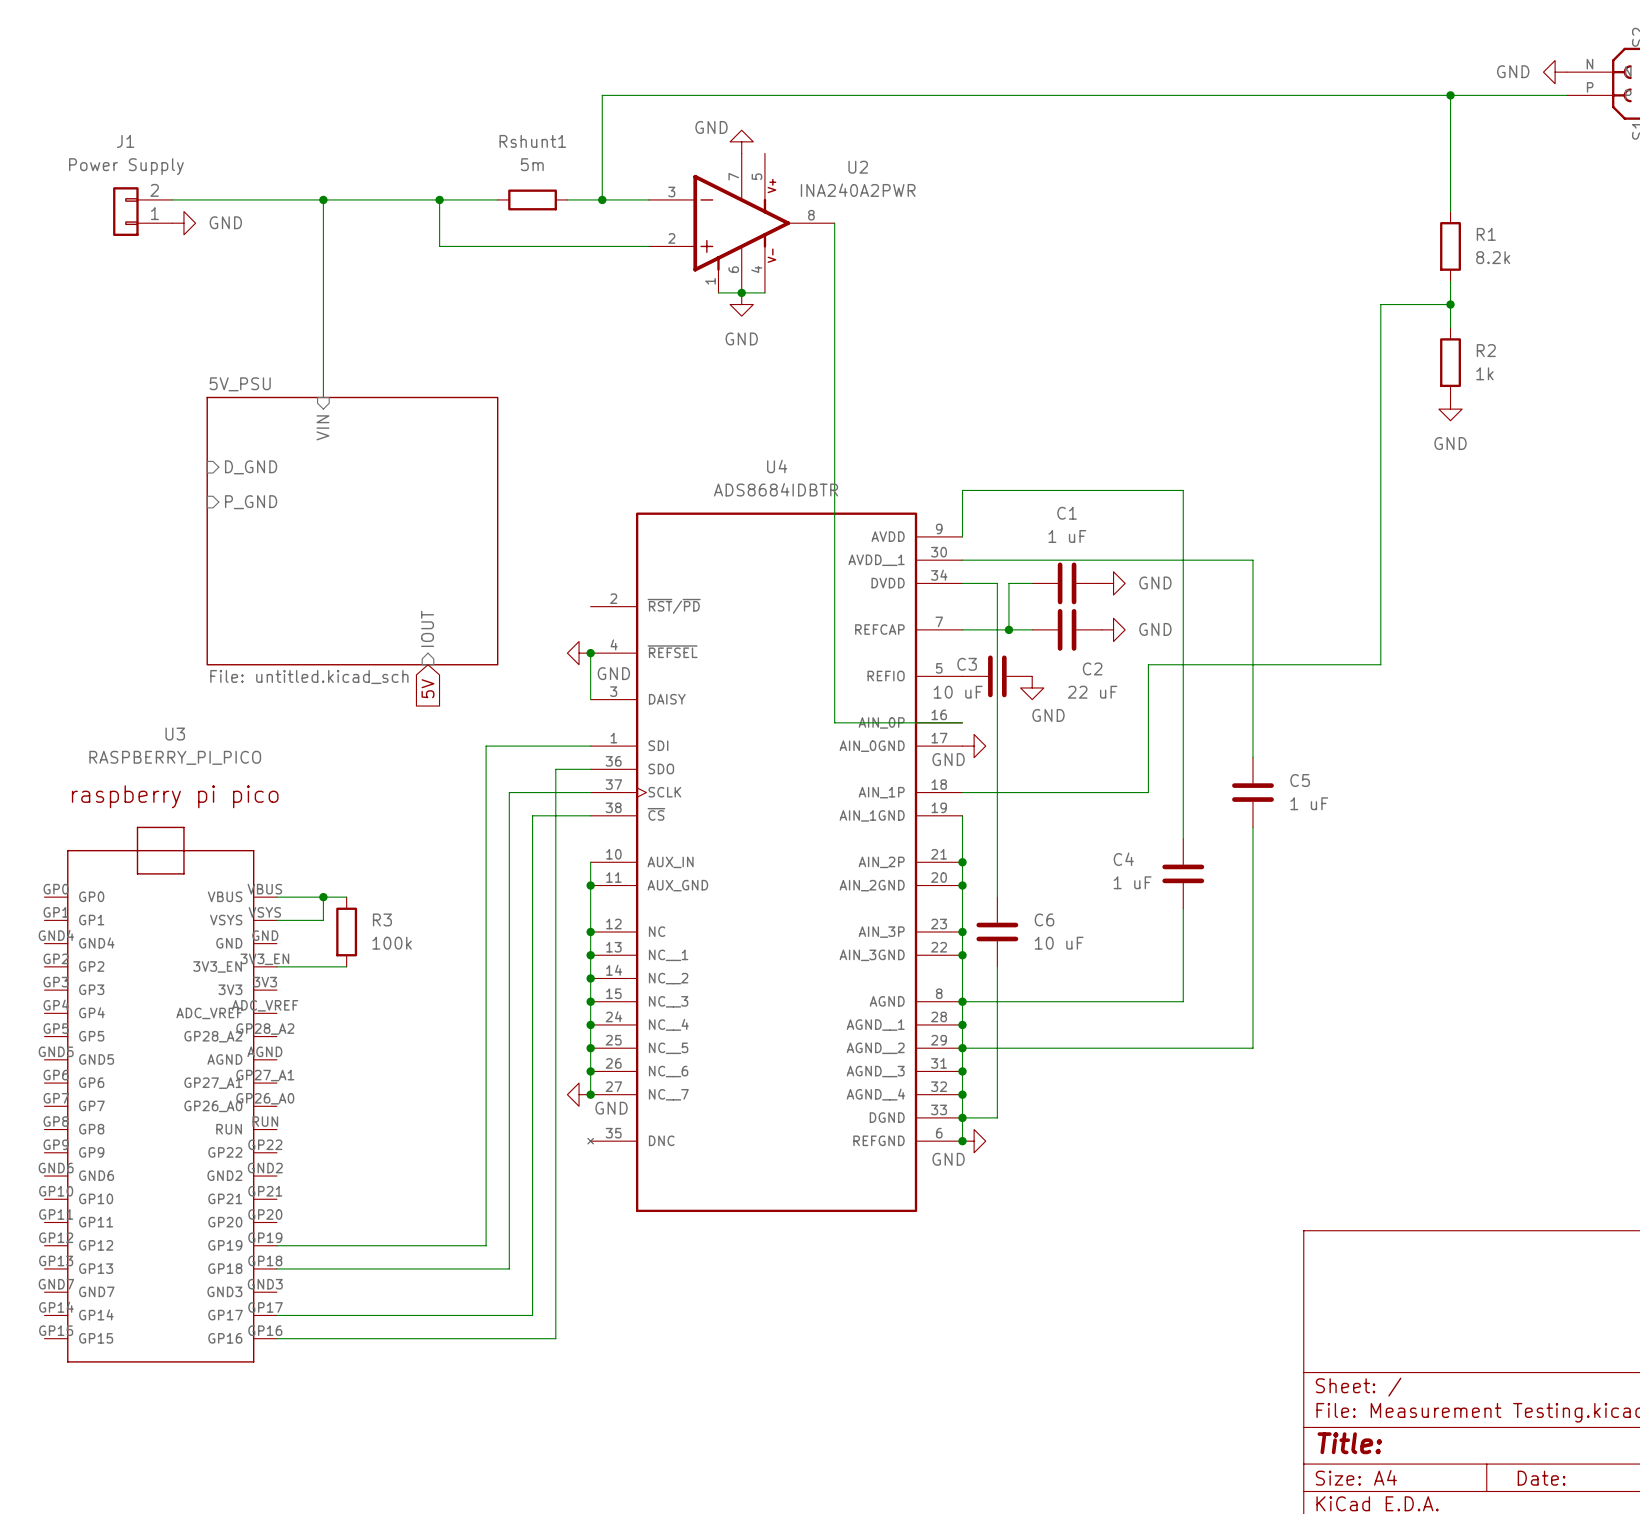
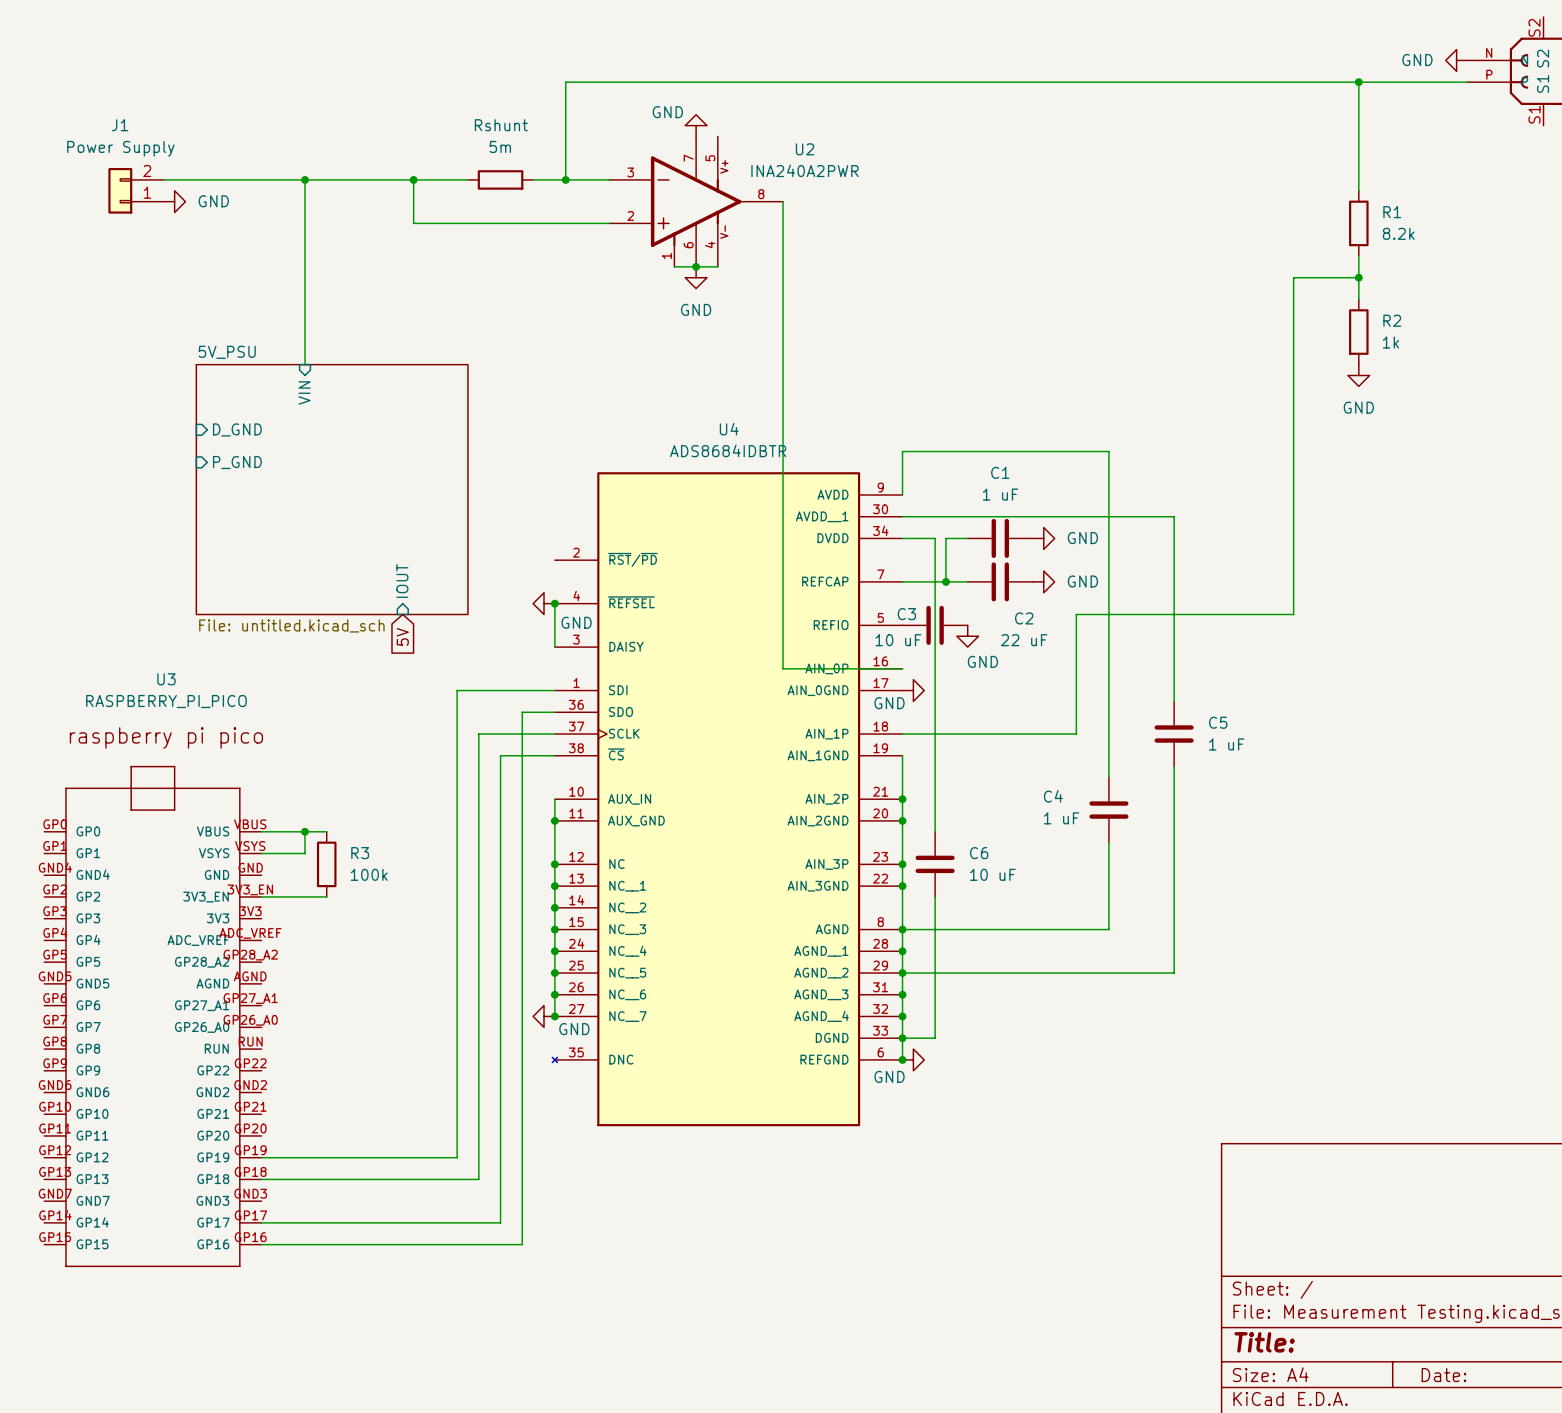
Rshunt1 name: Rshunt1 (532, 141) -> Rshunt (501, 125)

